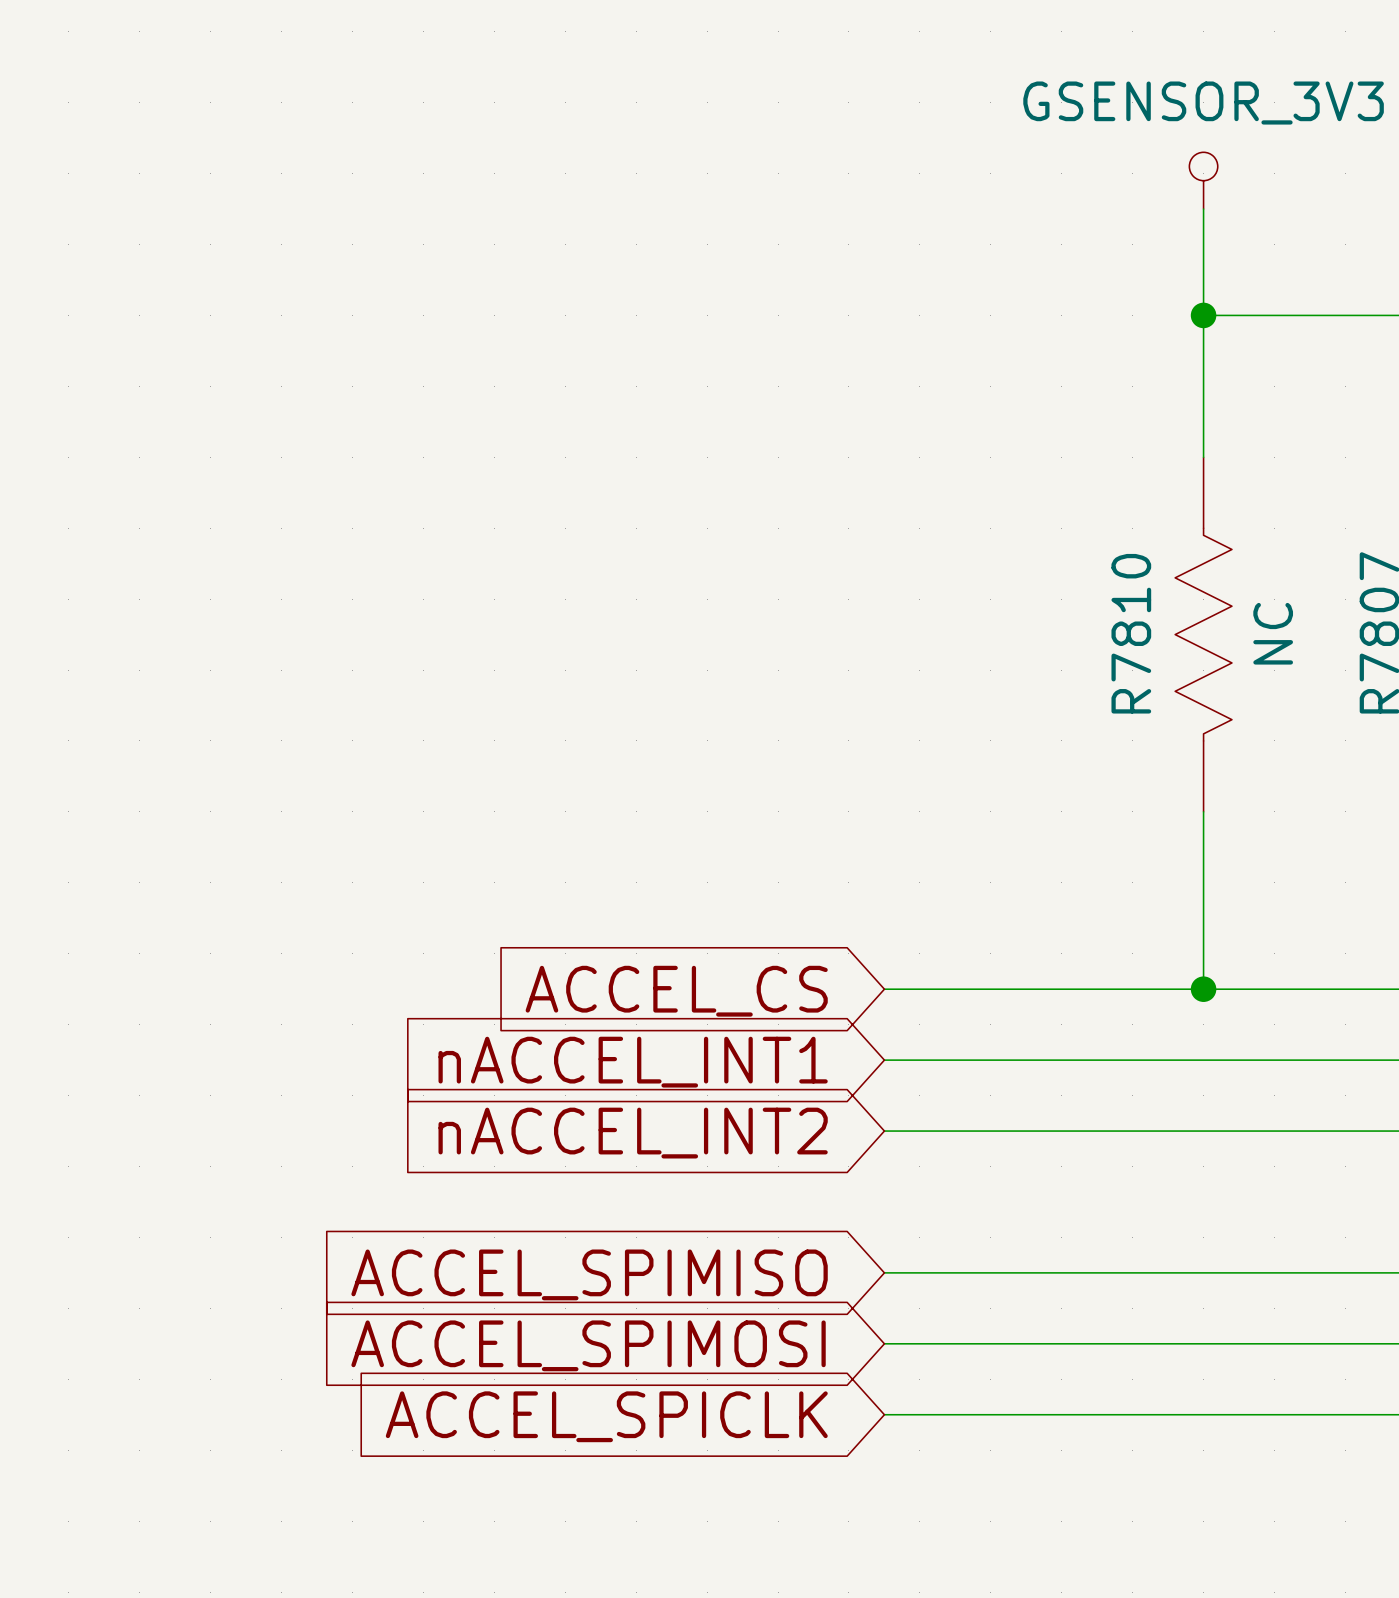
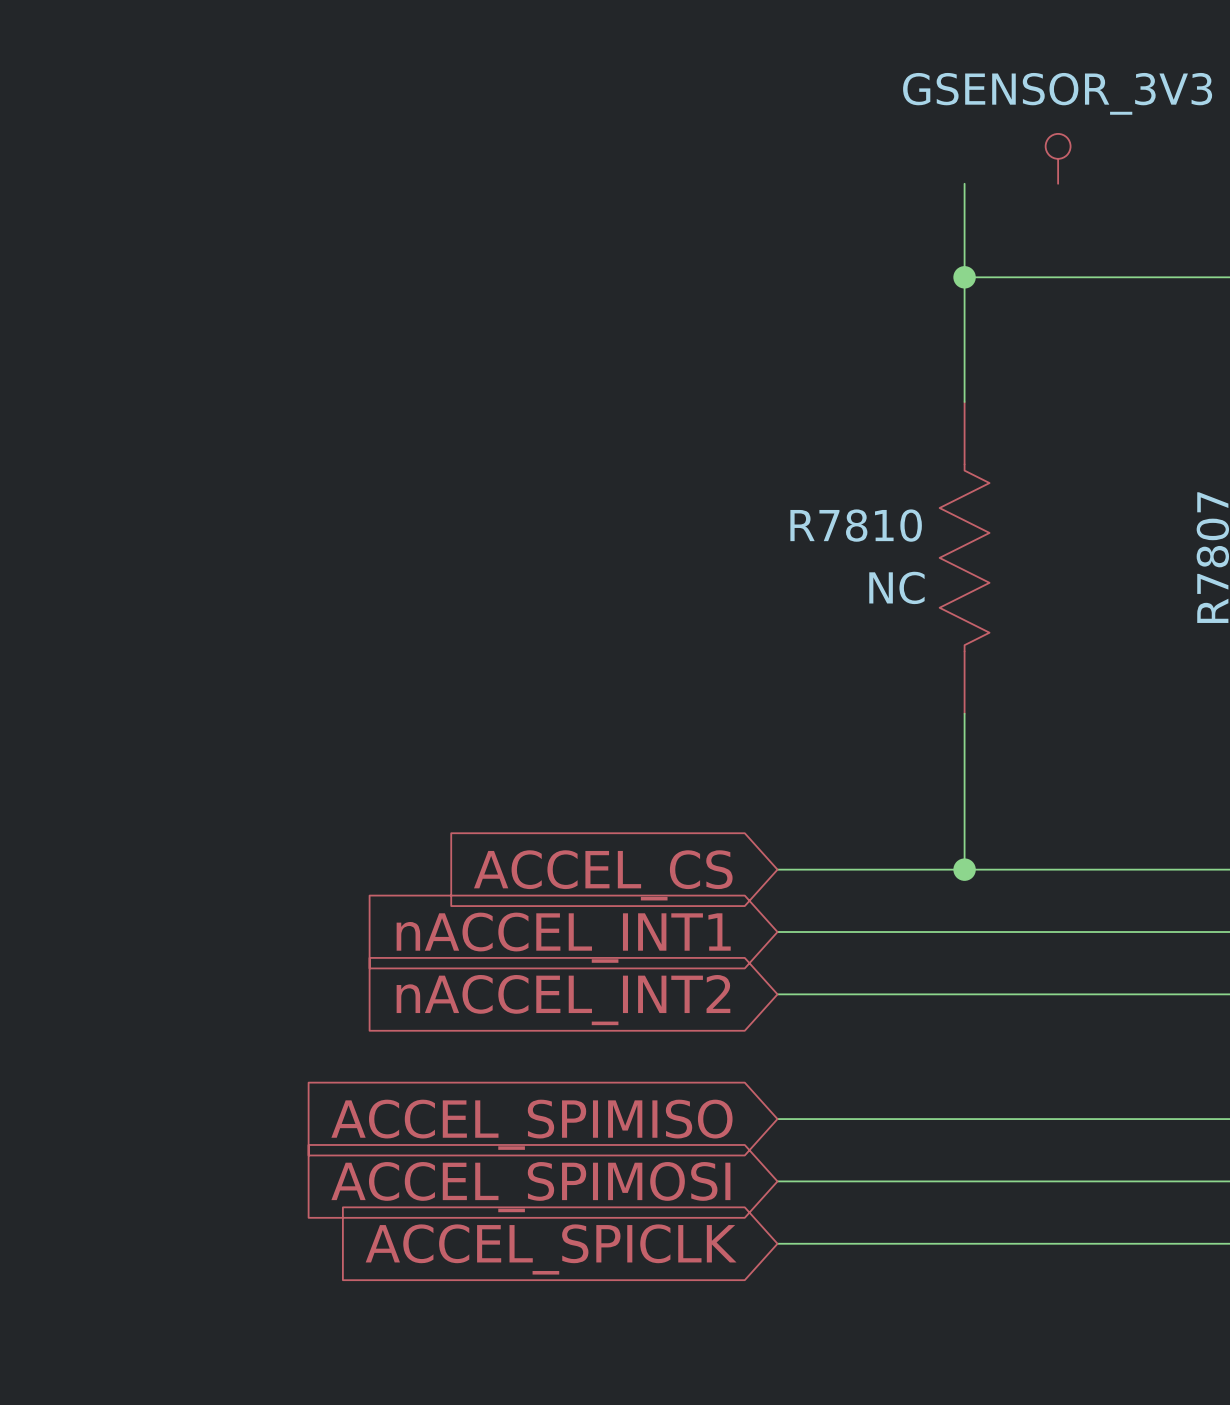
wire: (1203, 209) (1203, 457) -> (964, 183) (964, 402)
wire: none -> (964, 277) (1058, 277)
junction: none -> (964, 277)
junction: (1203, 315) -> none
R7810 name rotation: 0° (1131, 633) -> 90° clockwise (856, 525)
R7810 value rotation: 0° (1273, 633) -> 90° clockwise (896, 587)
R7810 value position: NC (1273, 633) -> NC (896, 587)
R7810 position: (1203, 634) -> (964, 557)
wire: (1203, 811) (1203, 989) -> (964, 713) (964, 869)
junction position: (1203, 989) -> (964, 869)

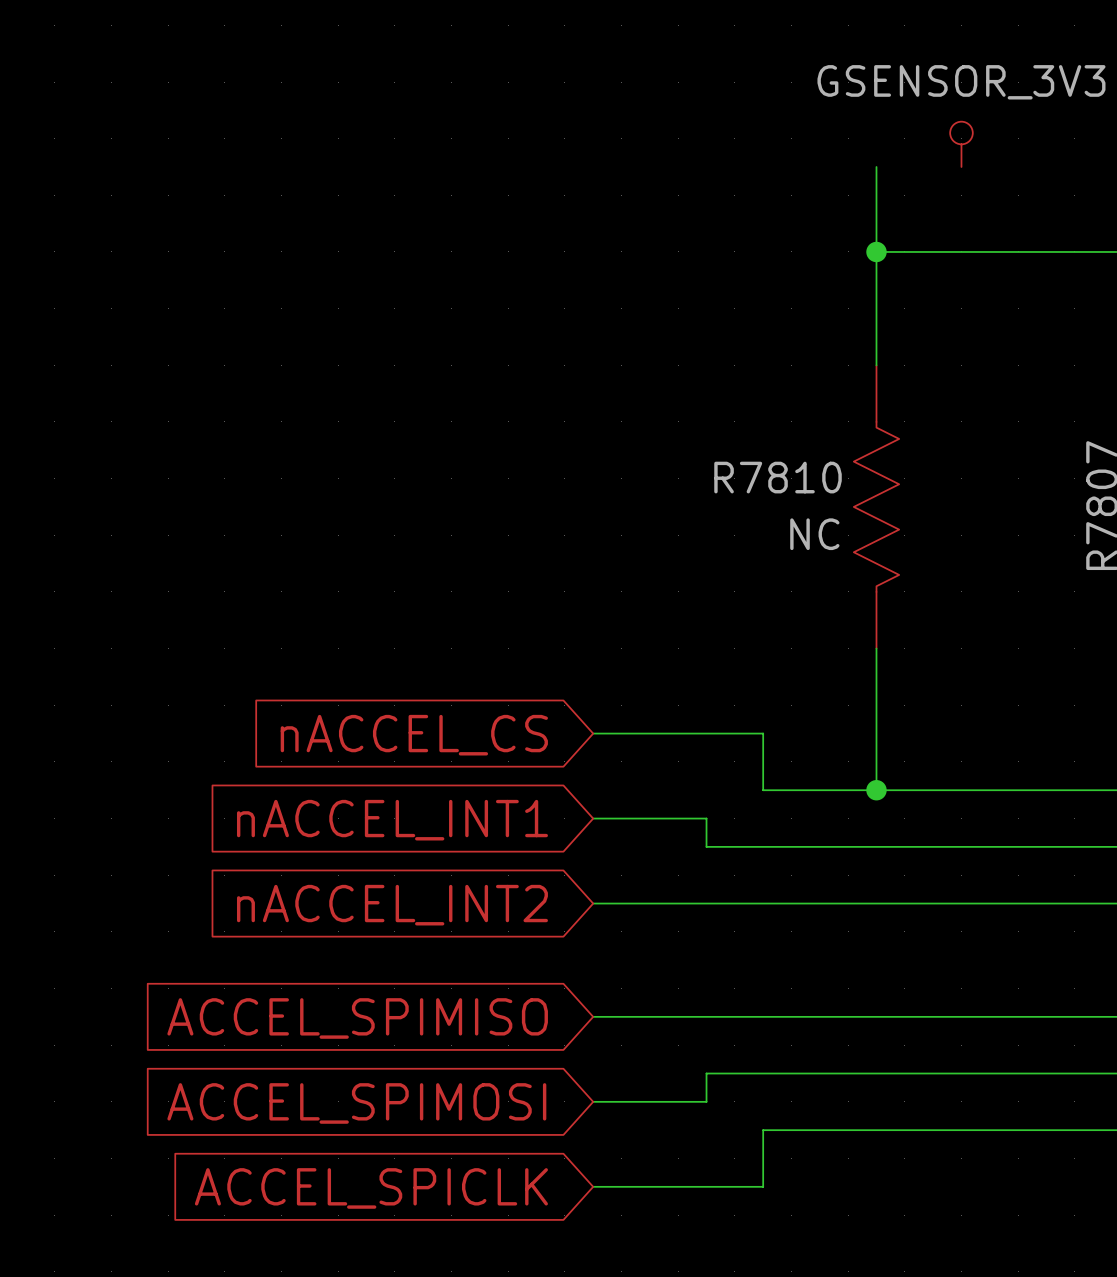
wire: (777, 869) (839, 869) -> (593, 733) (763, 733) (763, 790)
global label: ACCEL_CS (603, 875) -> nACCEL_CS (414, 735)
wire: none -> (593, 818) (706, 818) (706, 846)
global label position: nACCEL_INT1 (563, 937) -> nACCEL_INT1 (392, 820)
wire: none -> (593, 903) (706, 903)
global label position: nACCEL_INT2 (563, 1000) -> nACCEL_INT2 (392, 905)
wire: none -> (593, 1016) (706, 1016)
global label position: ACCEL_SPIMISO (531, 1124) -> ACCEL_SPIMISO (357, 1018)
wire: none -> (706, 1073) (706, 1101) (593, 1101)
global label position: ACCEL_SPIMOSI (530, 1187) -> ACCEL_SPIMOSI (356, 1103)
wire: (777, 1243) (839, 1243) -> (593, 1186) (763, 1186) (763, 1130)
global label position: ACCEL_SPICLK (551, 1249) -> ACCEL_SPICLK (371, 1188)

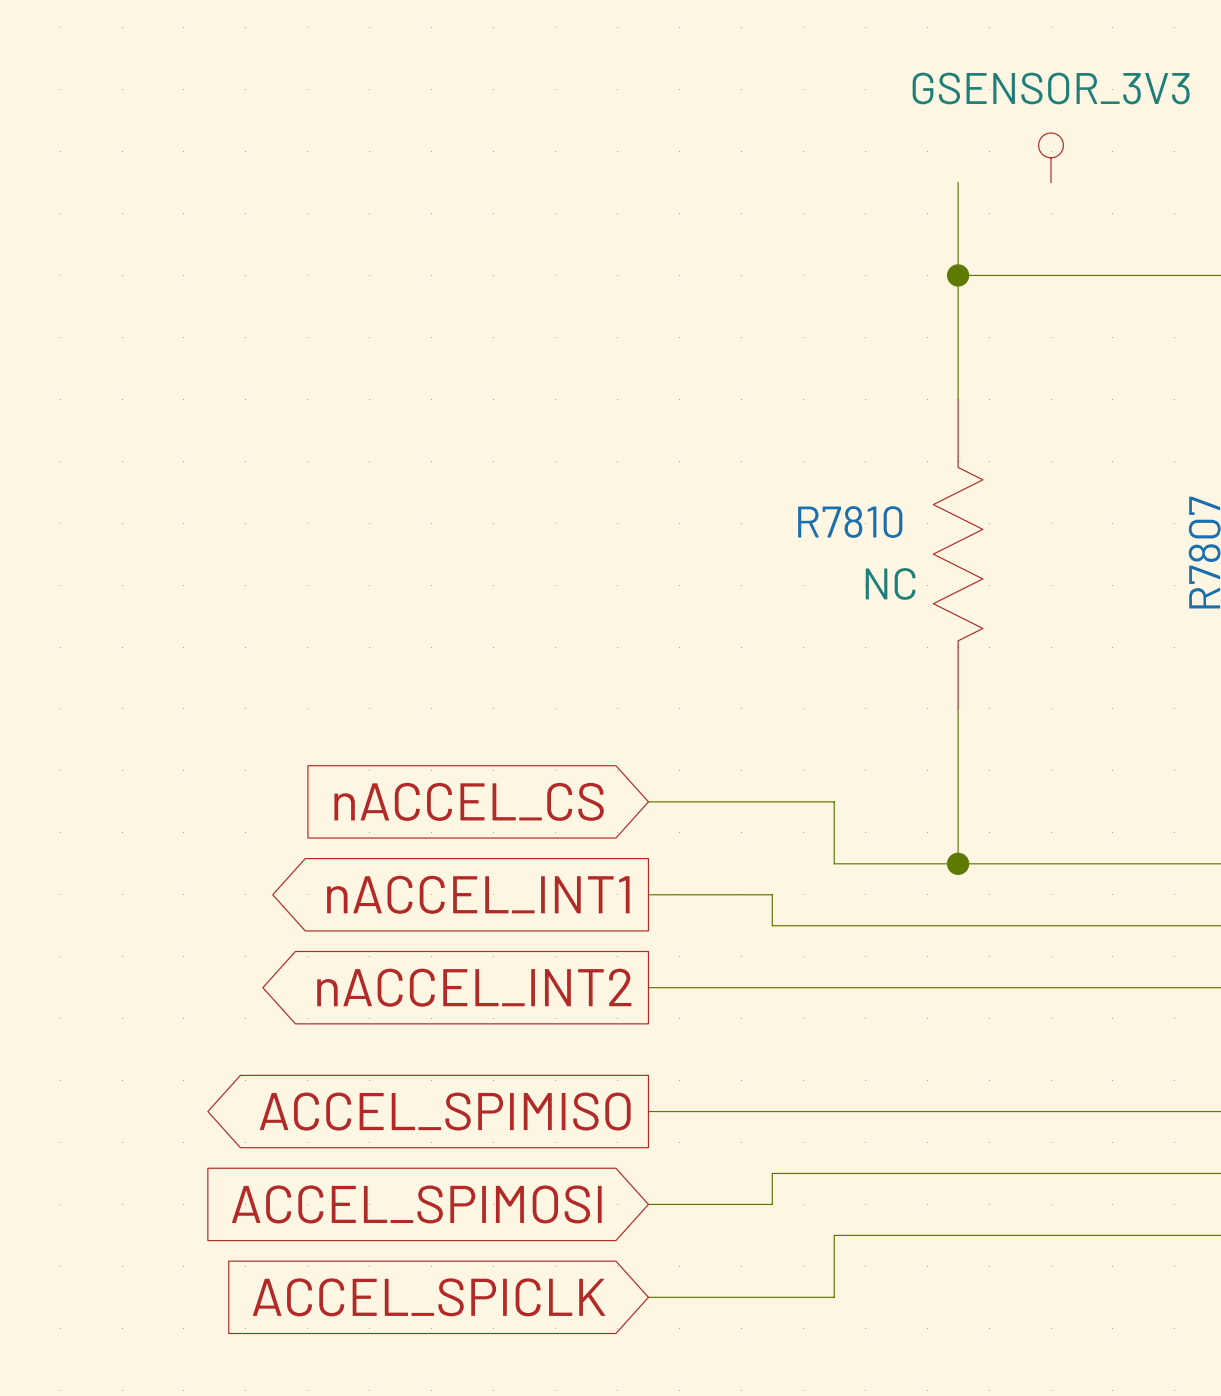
global label shape: input (392, 820) -> output (478, 894)
global label shape: input (392, 905) -> output (474, 987)
global label shape: input (357, 1018) -> output (445, 1111)

